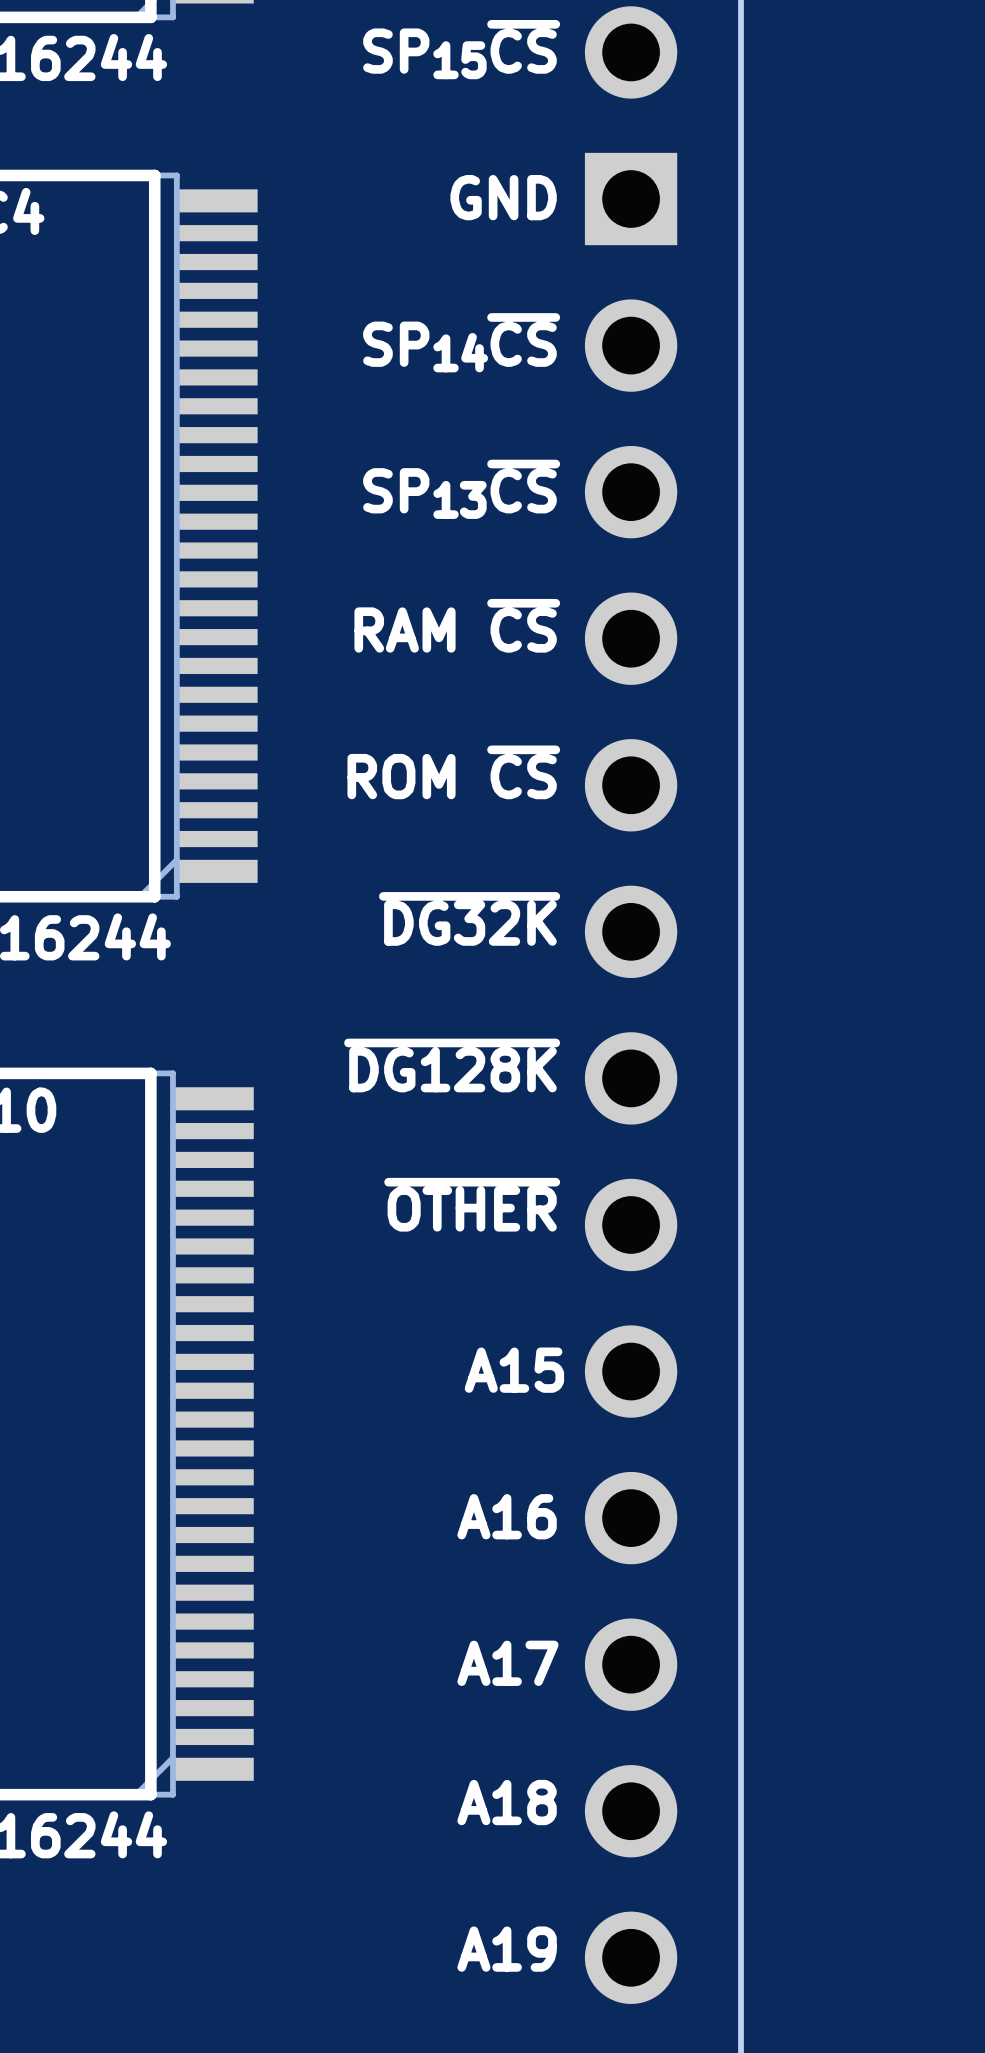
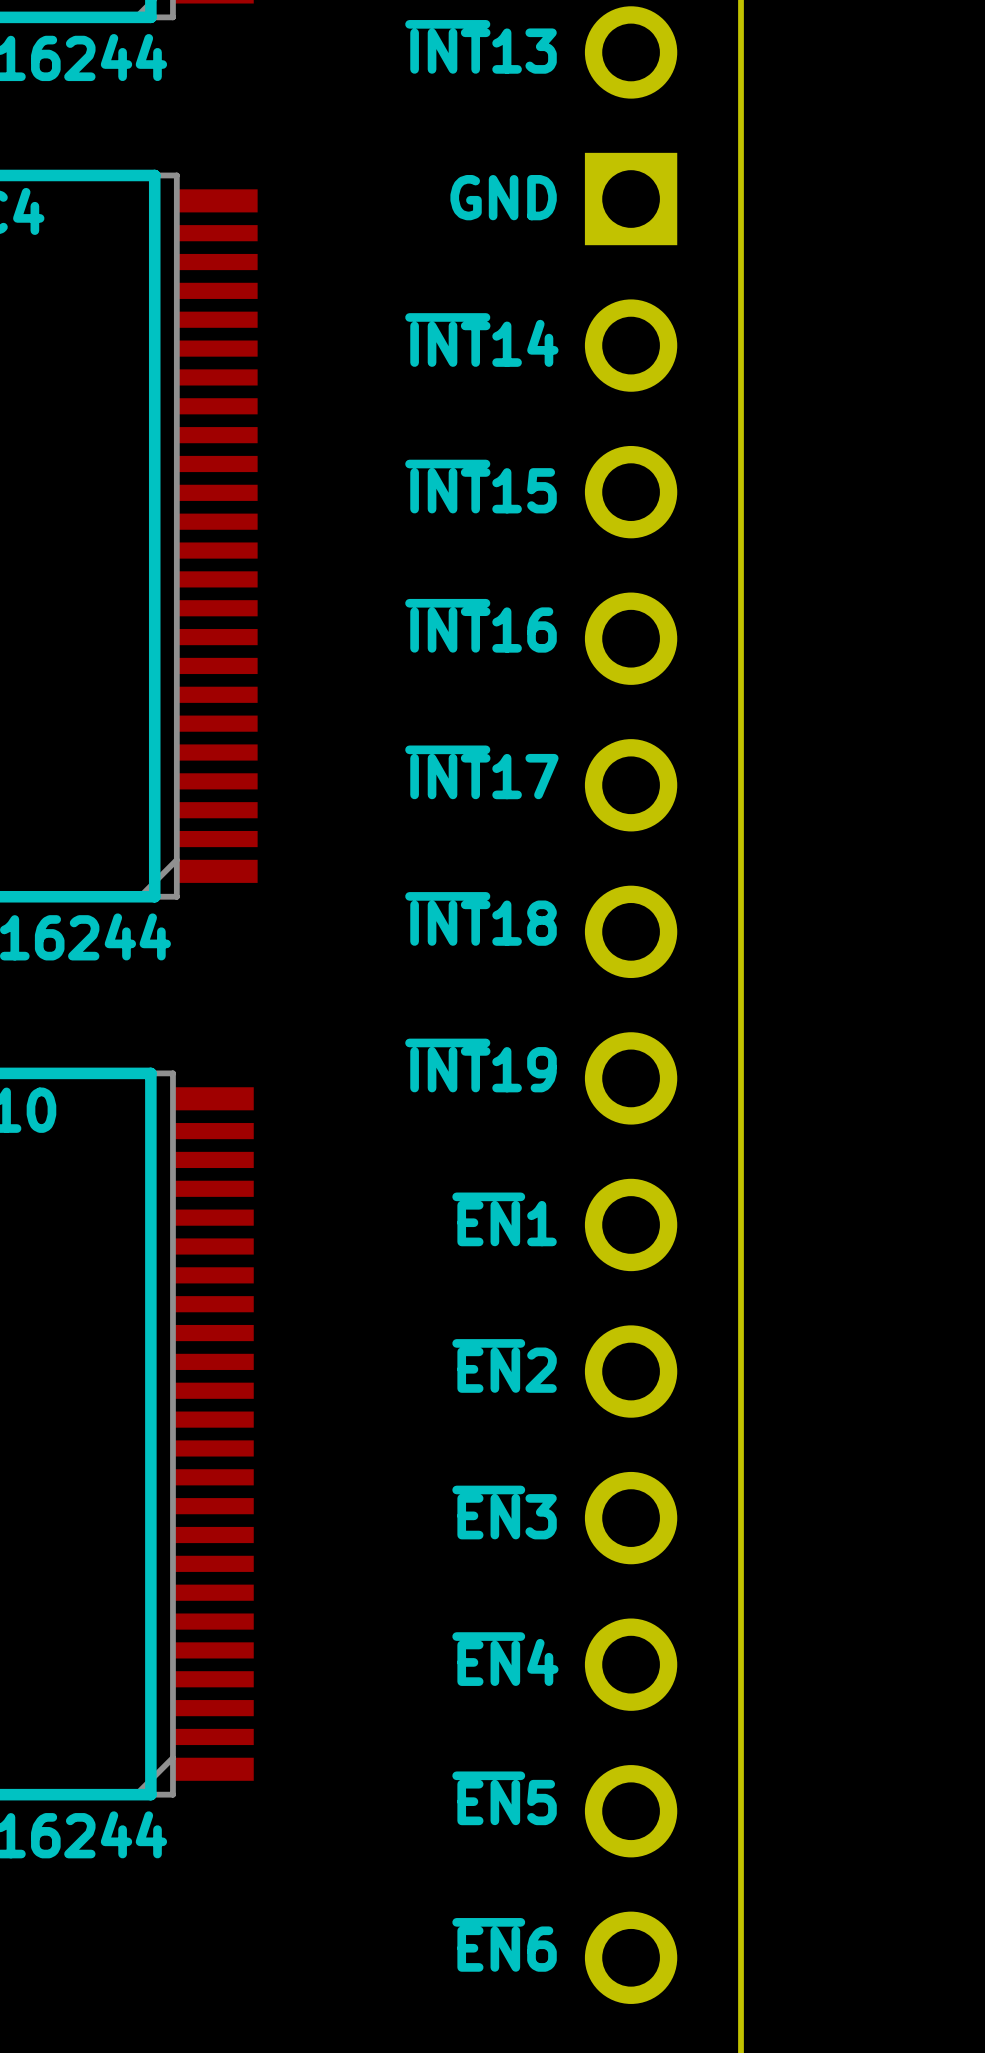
text: SP15~{CS} (461, 49) -> ~{INT}13 (480, 46)
text: SP14~{CS} (461, 342) -> ~{INT}14 (481, 340)
text: SP13~{CS} (461, 489) -> ~{INT}15 (480, 486)
text: RAM ~{CS} (457, 625) -> ~{INT}16 (480, 625)
text: ROM ~{CS} (453, 772) -> ~{INT}17 (481, 772)
text: ~{DG32K} (469, 918) -> ~{INT}18 (480, 918)
text: ~{DG128K} (452, 1065) -> ~{INT}19 (480, 1065)
text: ~{OTHER} (472, 1204) -> ~{EN}1 (504, 1219)
text: A15 (514, 1370) -> ~{EN}2 (504, 1365)
text: A16 (507, 1516) -> ~{EN}3 (504, 1512)
text: A17 (507, 1663) -> ~{EN}4 (505, 1659)
text: A18 (507, 1802) -> ~{EN}5 (504, 1798)
text: A19 (507, 1949) -> ~{EN}6 (504, 1944)

